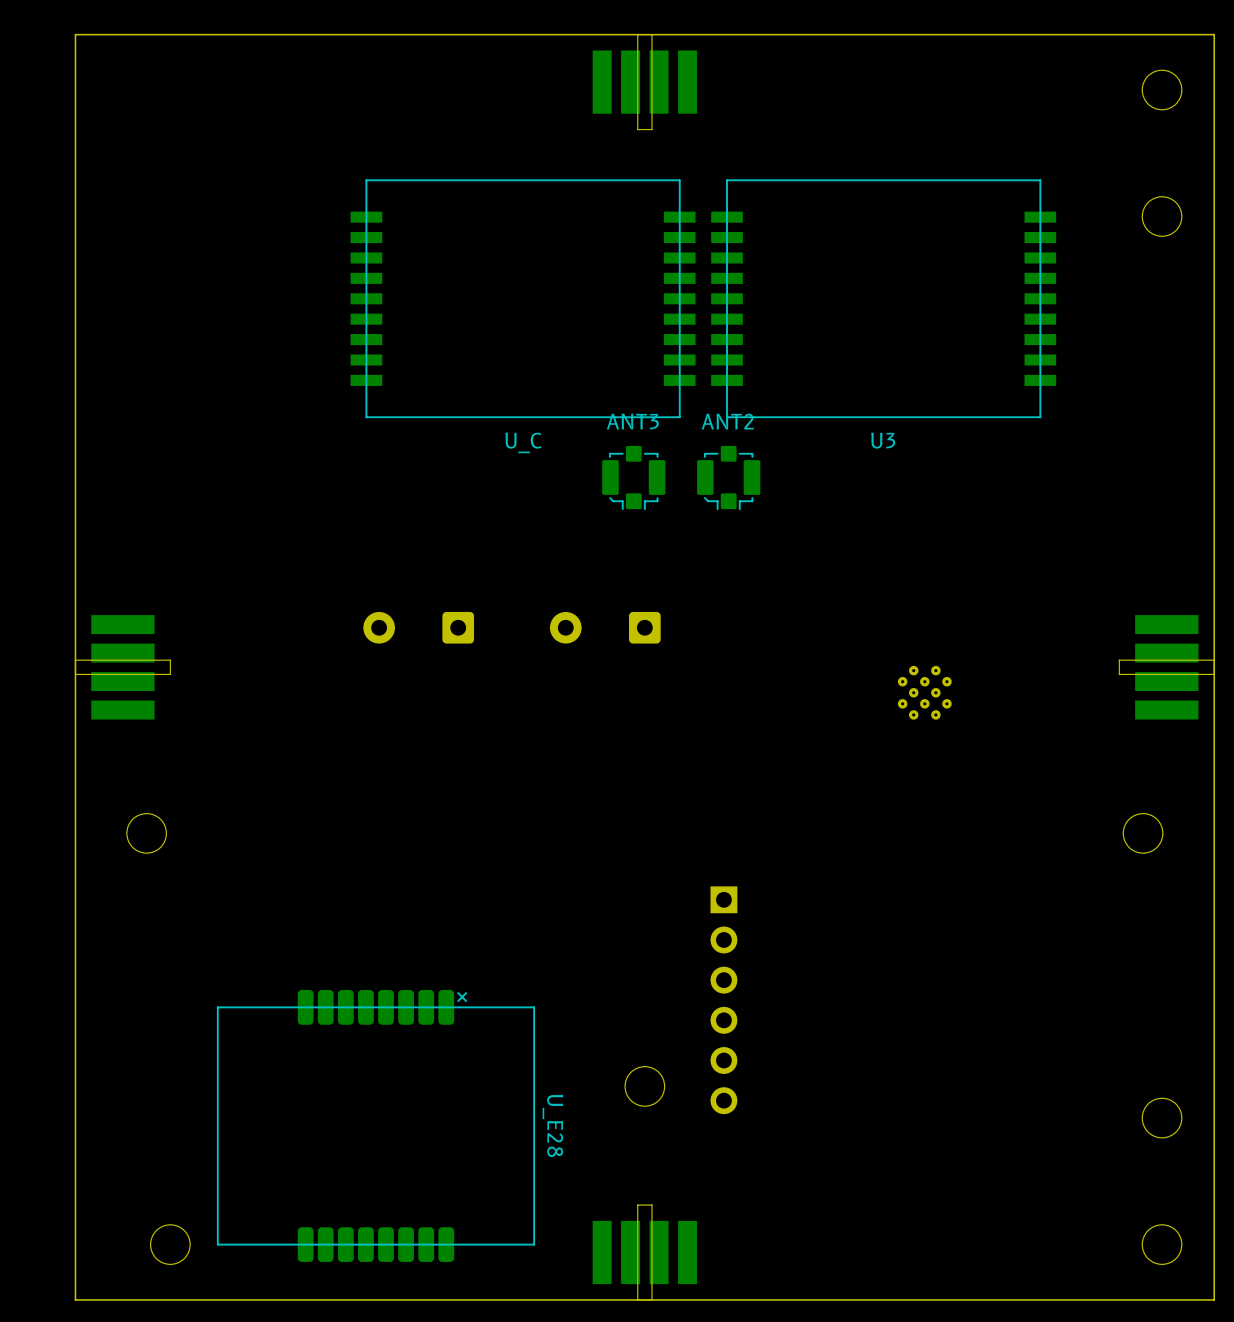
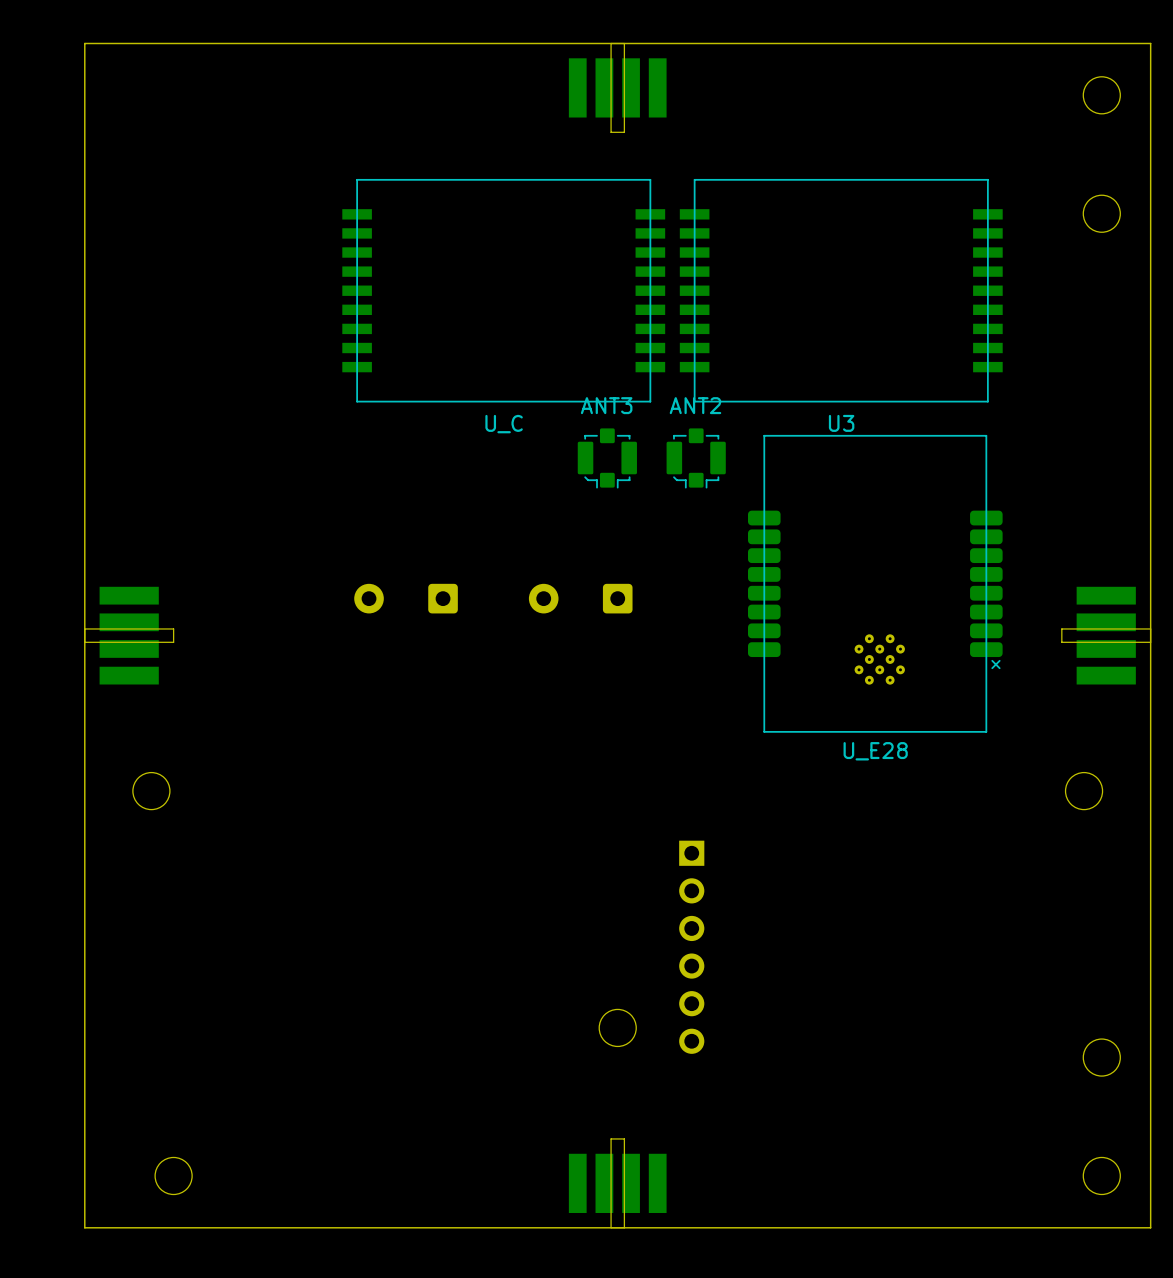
U_E28 rotation: 0° (375, 1125) -> 90° clockwise (875, 583)
U_E28 position: (375, 1125) -> (875, 583)

